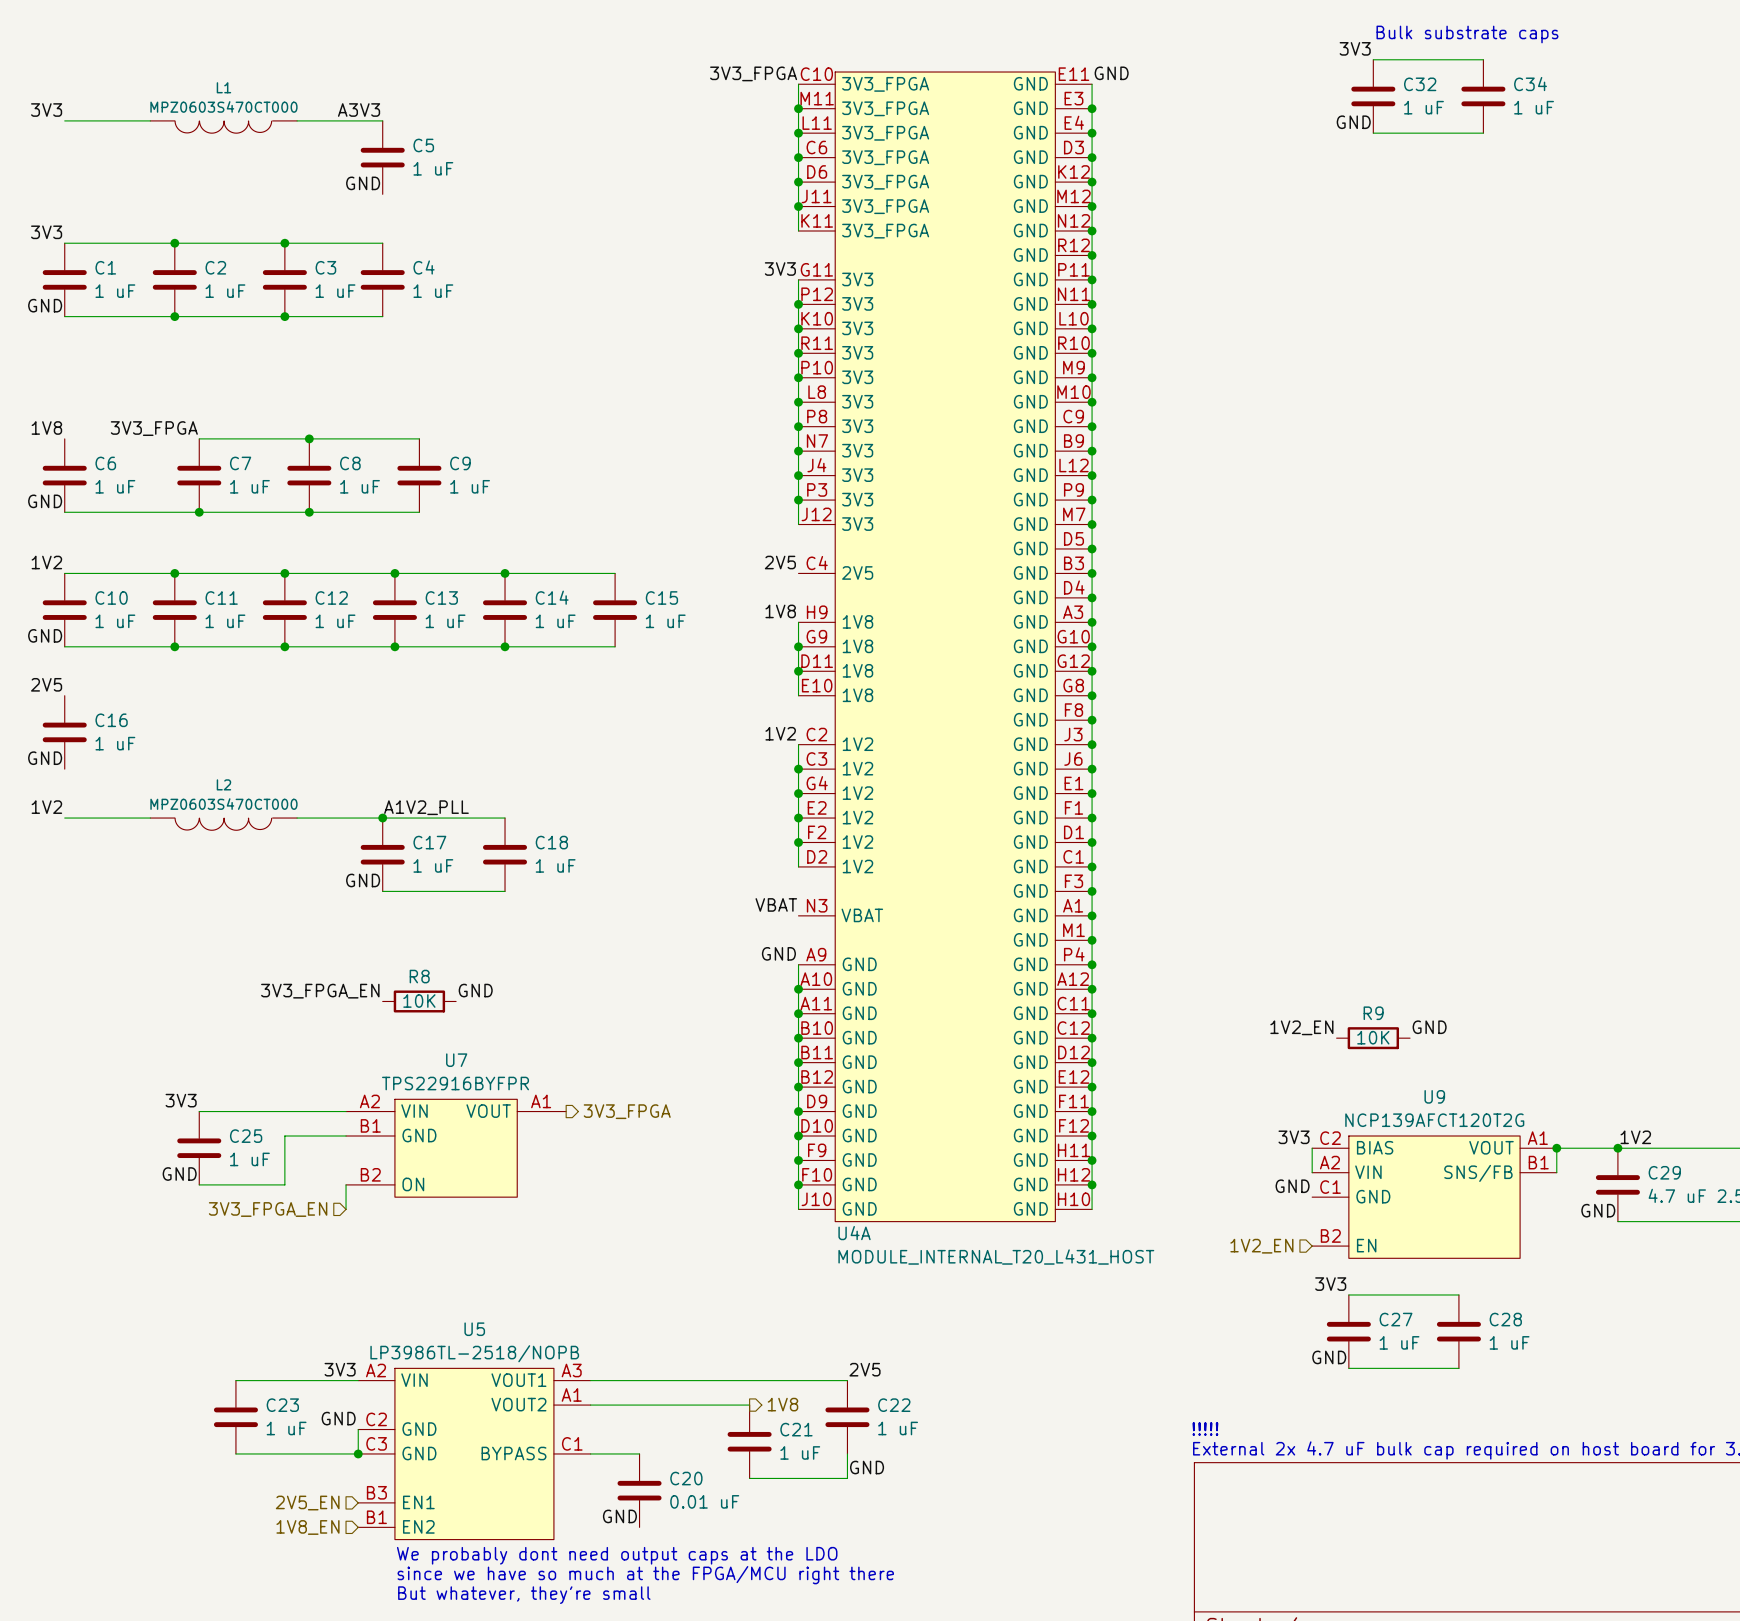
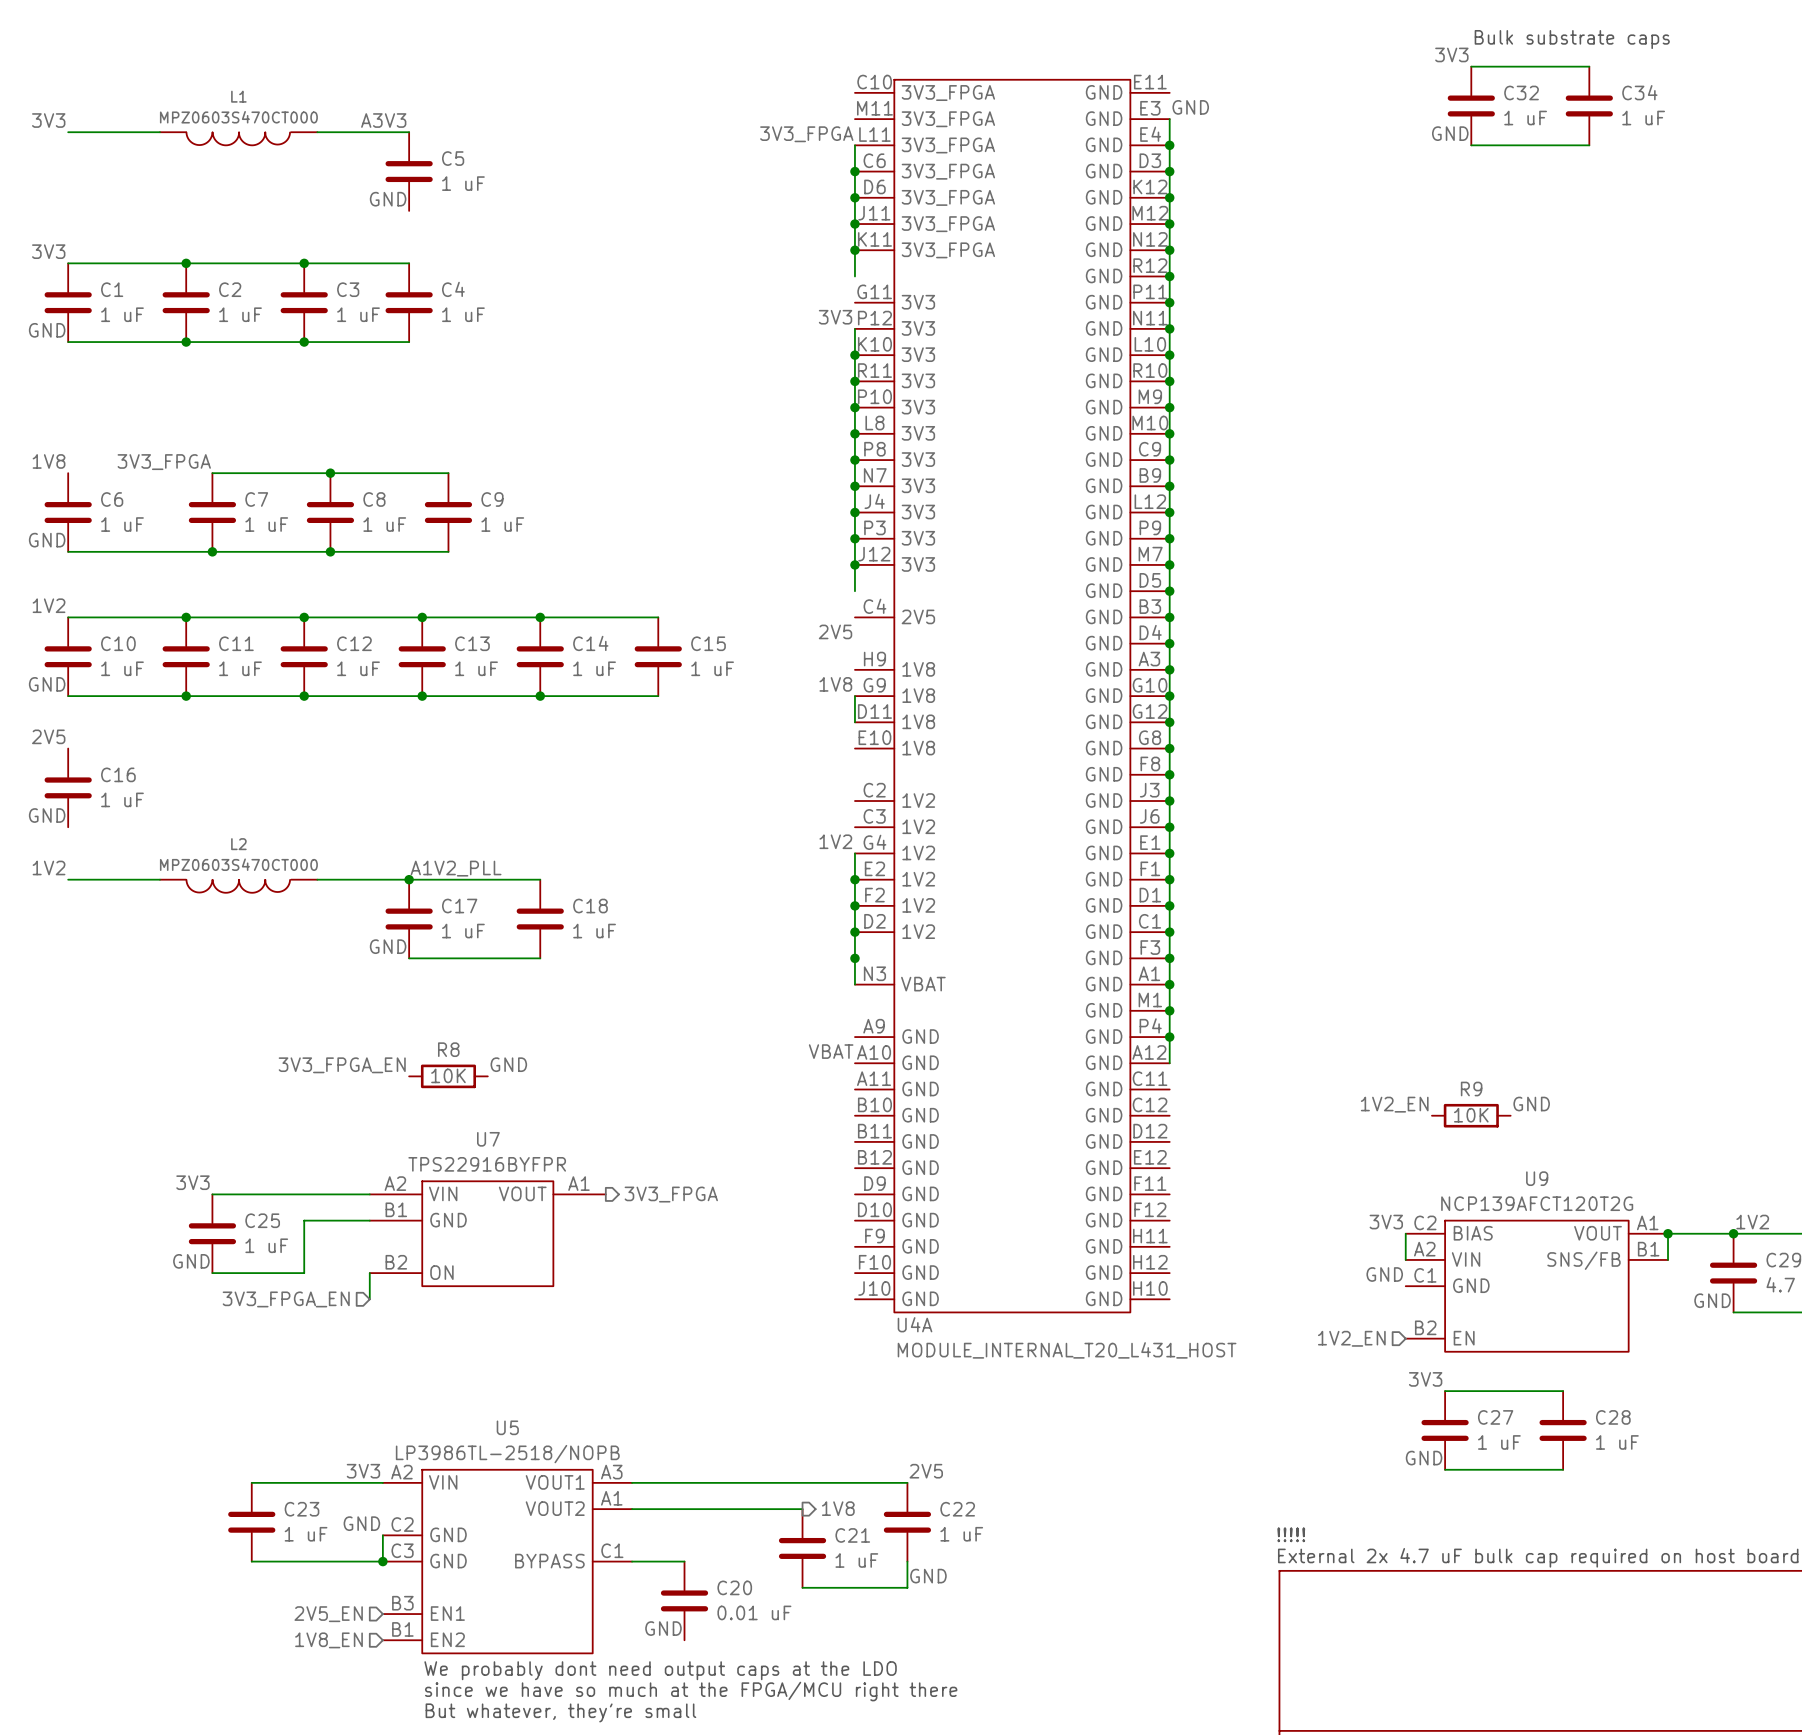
label position: 3V3_FPGA (753, 73) -> 3V3_FPGA (806, 134)
label position: GND (1111, 73) -> GND (1190, 107)
wire: (798, 84) (798, 133) -> none
wire: (1092, 84) (1092, 108) -> none
junction: (798, 108) -> none
junction: (1092, 108) -> none
junction: (798, 133) -> none
junction: none -> (854, 250)
label position: 3V3 (780, 269) -> 3V3 (835, 317)
wire: (798, 279) (798, 304) -> (854, 250) (854, 276)
junction: (798, 304) -> none
junction: none -> (854, 564)
label position: 2V5 (780, 562) -> 2V5 (835, 631)
label position: 1V8 (780, 611) -> 1V8 (835, 684)
wire: (798, 622) (798, 646) -> (854, 564) (854, 591)
junction: (798, 646) -> none
wire: (798, 671) (798, 695) -> none
junction: (798, 671) -> none
label position: 1V2 (780, 733) -> 1V2 (835, 841)
wire: (798, 744) (798, 793) -> (854, 932) (854, 984)
junction: (798, 769) -> none
junction: (798, 793) -> none
junction: none -> (854, 932)
junction: none -> (854, 958)
label position: VBAT (776, 904) -> VBAT (831, 1051)
label: GND (778, 953) -> none
wire: (798, 964) (798, 1209) -> none
junction: (798, 989) -> none
wire: (1092, 989) (1092, 1209) -> none
junction: (1092, 989) -> none
junction: (798, 1013) -> none
junction: (1092, 1013) -> none
junction: (798, 1038) -> none
junction: (1092, 1038) -> none
junction: (798, 1062) -> none
junction: (1092, 1062) -> none
junction: (798, 1087) -> none
junction: (1092, 1087) -> none
junction: (798, 1111) -> none
junction: (1092, 1111) -> none
junction: (798, 1136) -> none
junction: (1092, 1136) -> none
junction: (798, 1160) -> none
junction: (1092, 1160) -> none
junction: (798, 1184) -> none
junction: (1092, 1184) -> none

